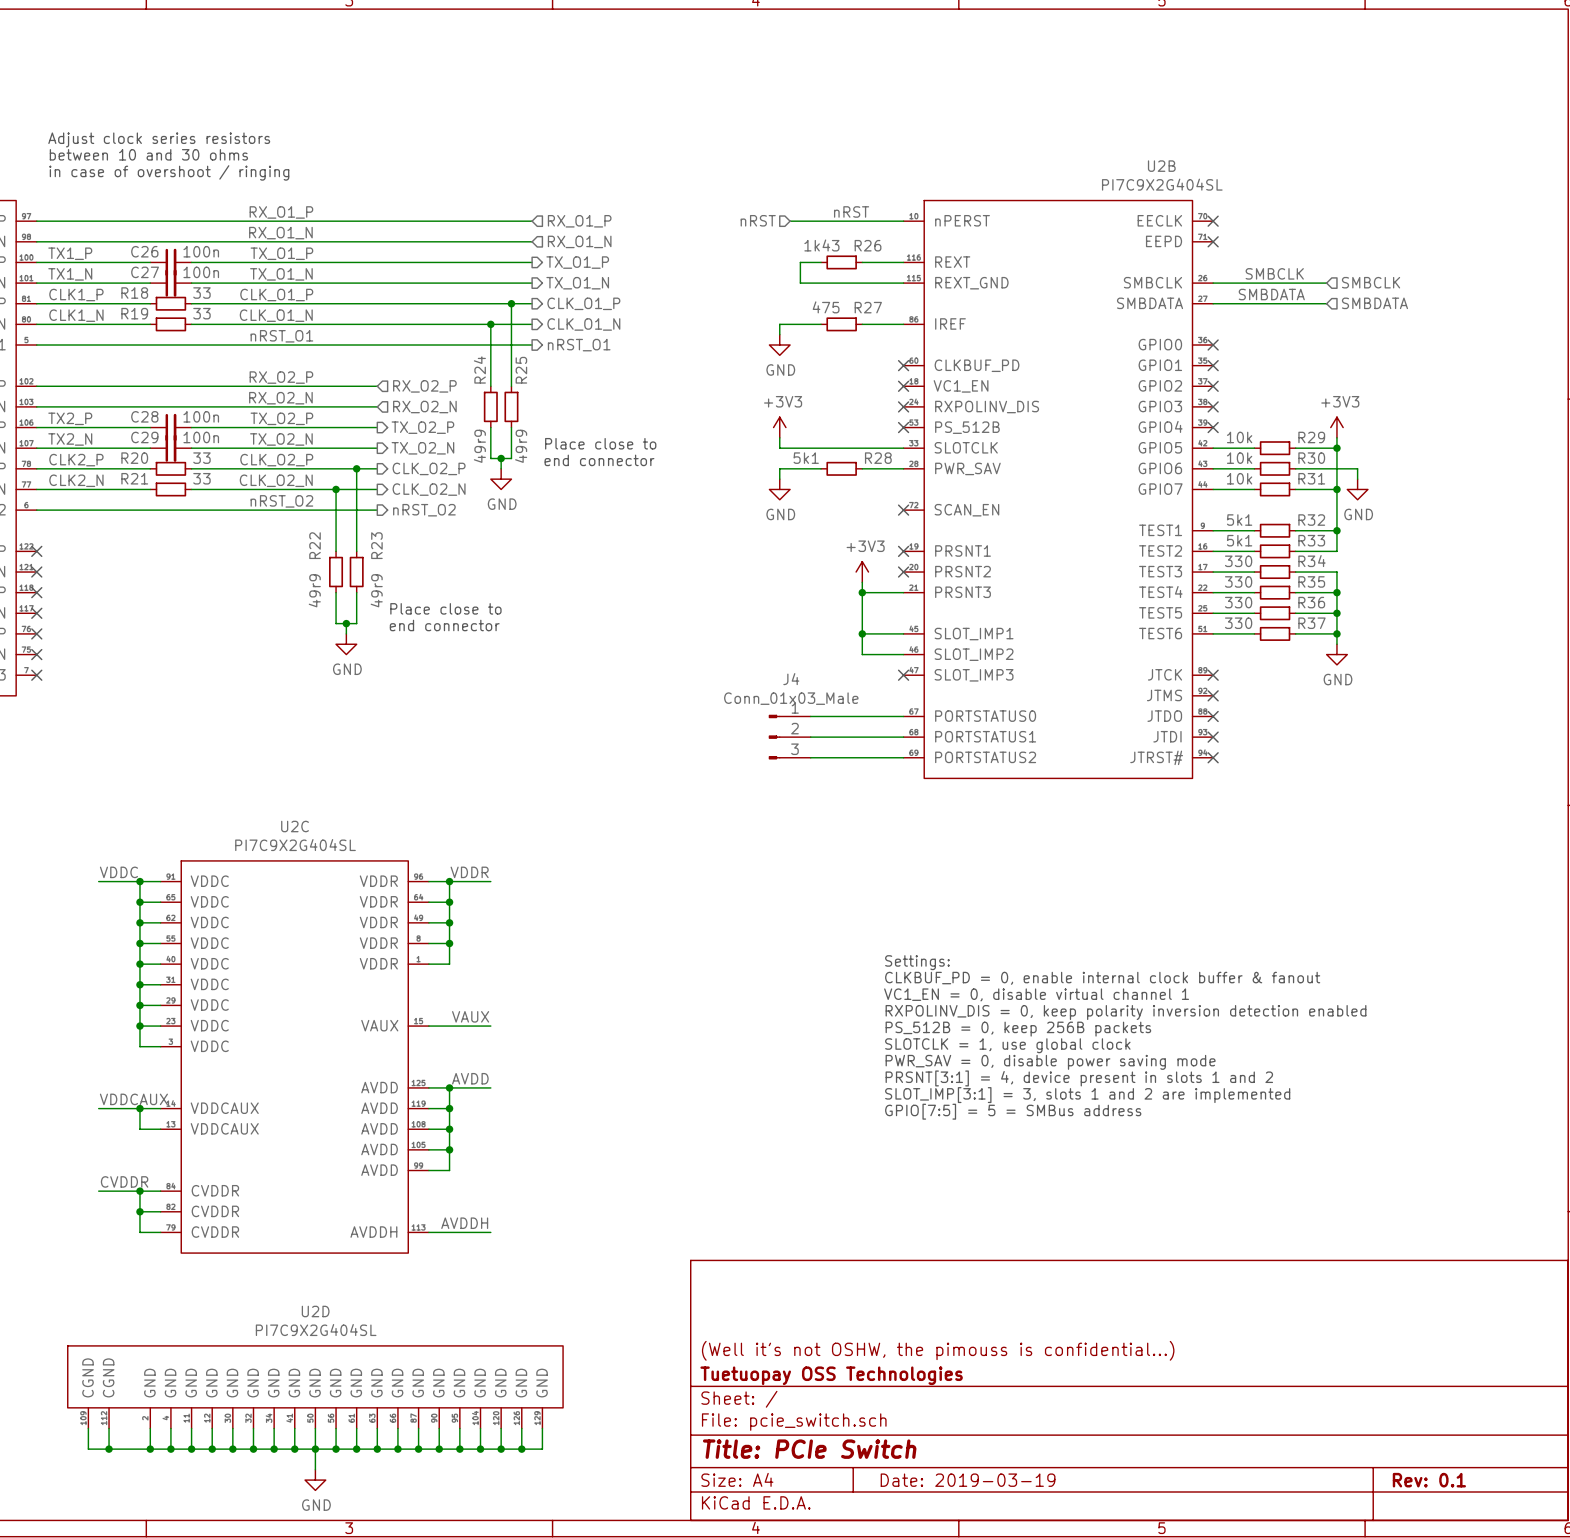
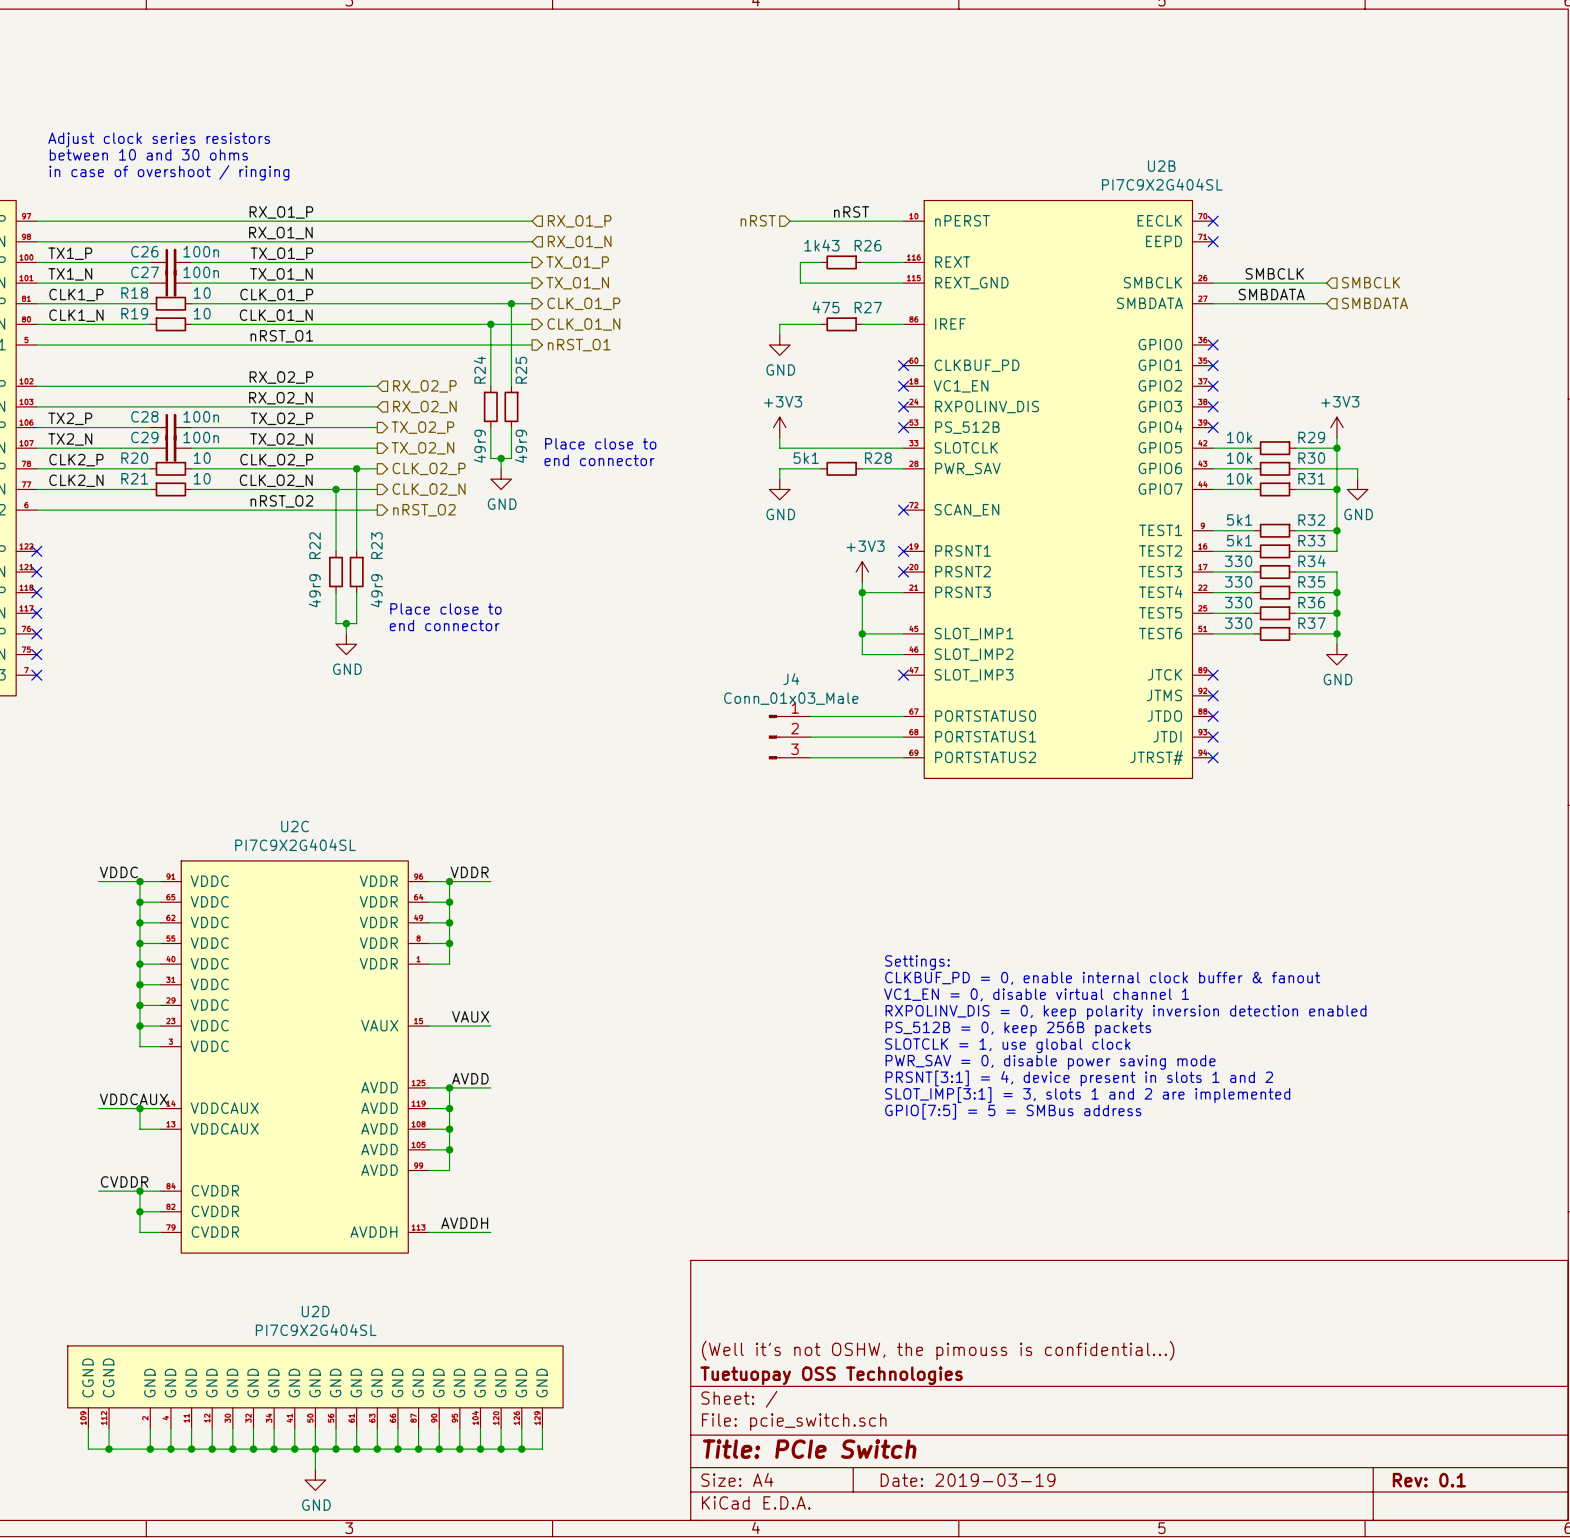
R18 value: 33 (201, 293) -> 10 (202, 293)
R19 value: 33 (201, 313) -> 10 (202, 313)
R20 value: 33 (201, 458) -> 10 (202, 458)
R21 value: 33 (201, 478) -> 10 (202, 478)

